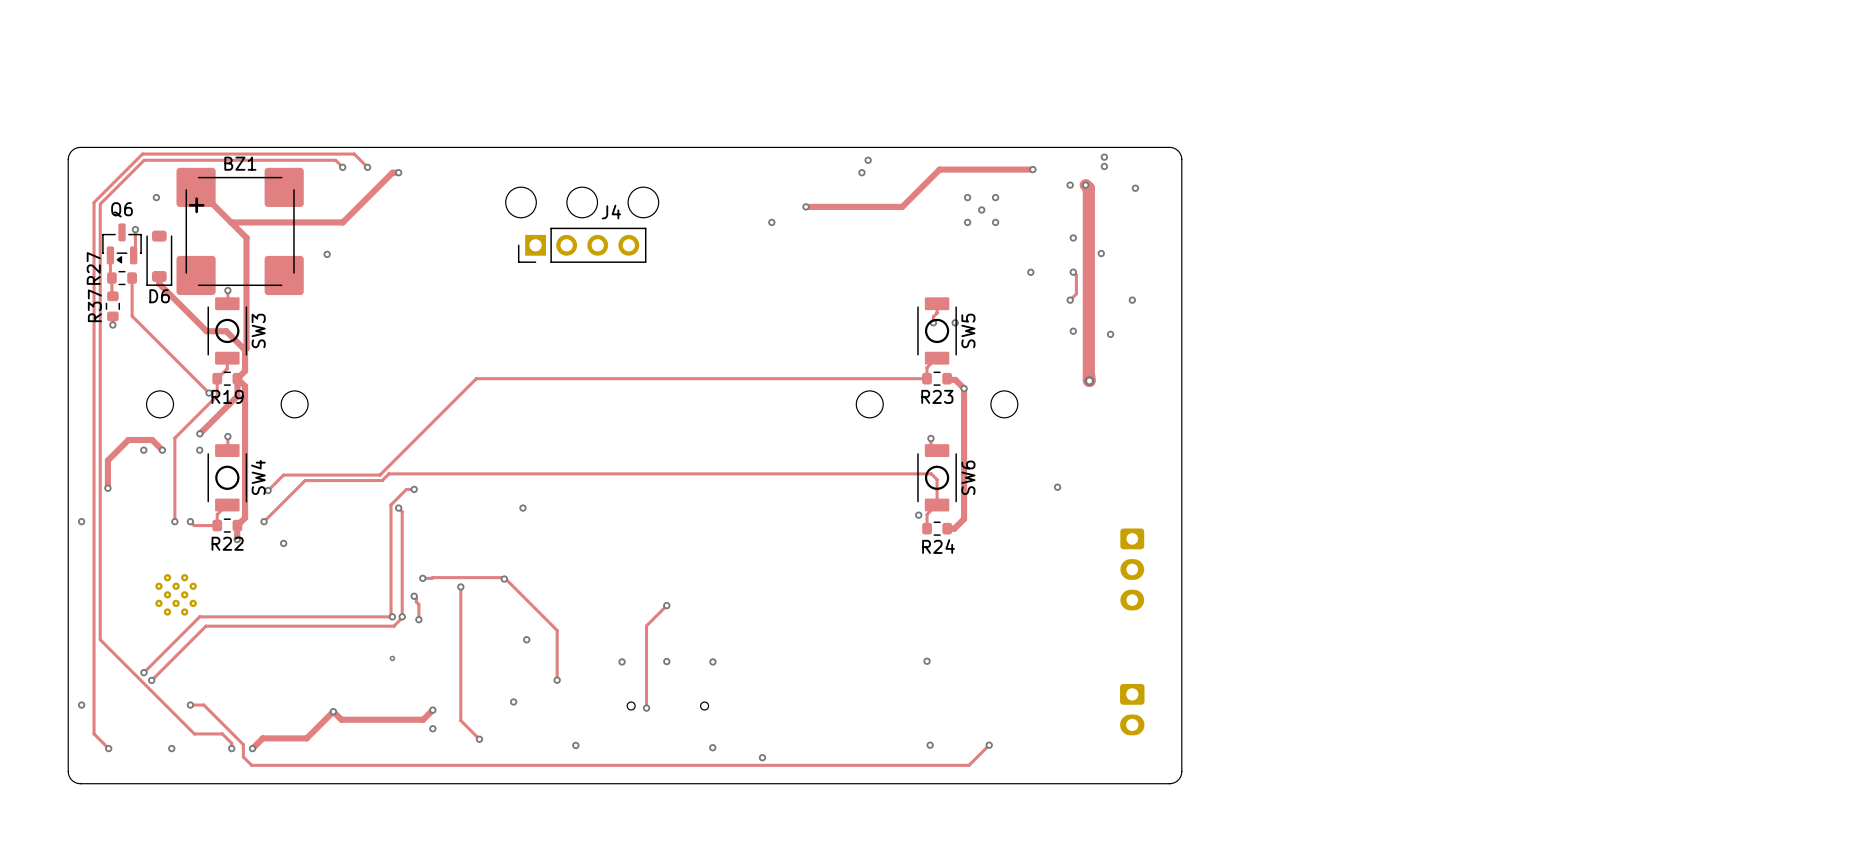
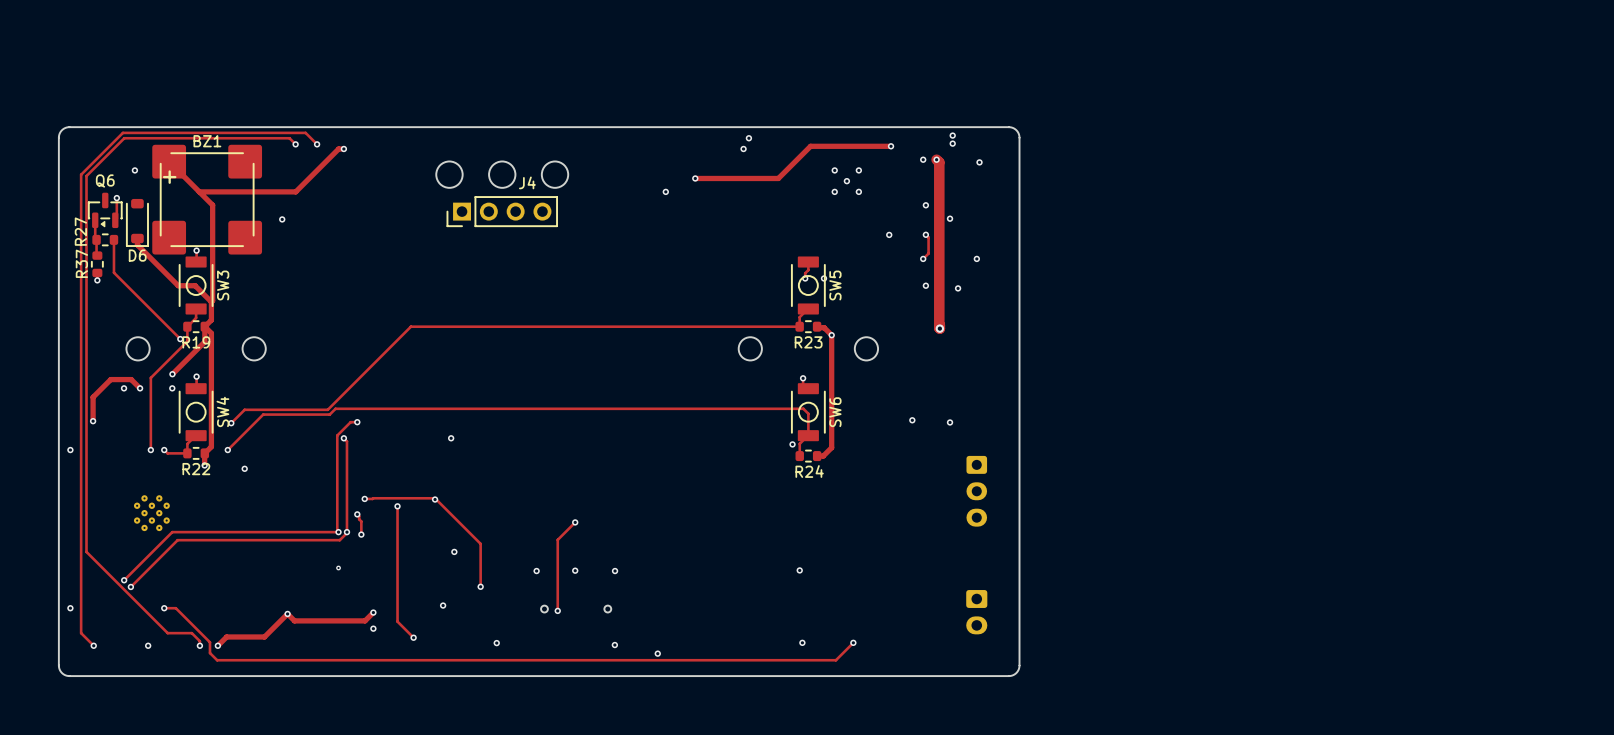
via: none -> (950, 422)

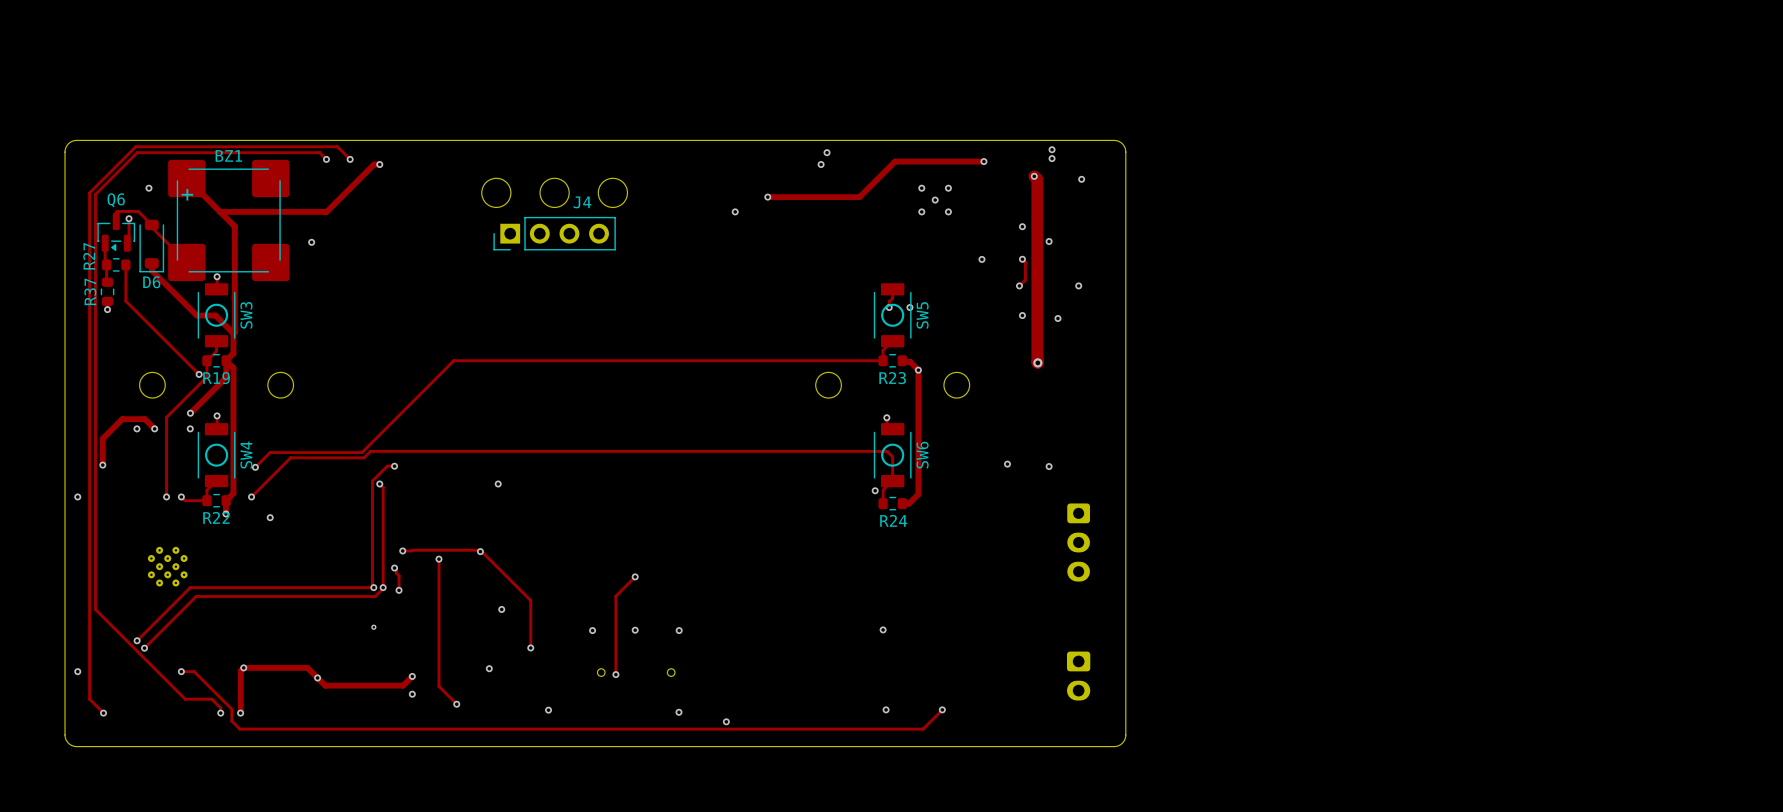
via: (923, 159) -> none
track: none -> (116, 221) (117, 211) (138, 211) (186, 262)
via: none -> (243, 667)
track: (287, 613) (264, 636) (226, 636) (218, 645) -> (317, 677) (307, 667) (243, 667) (240, 670) (240, 712)
via: (148, 645) -> none

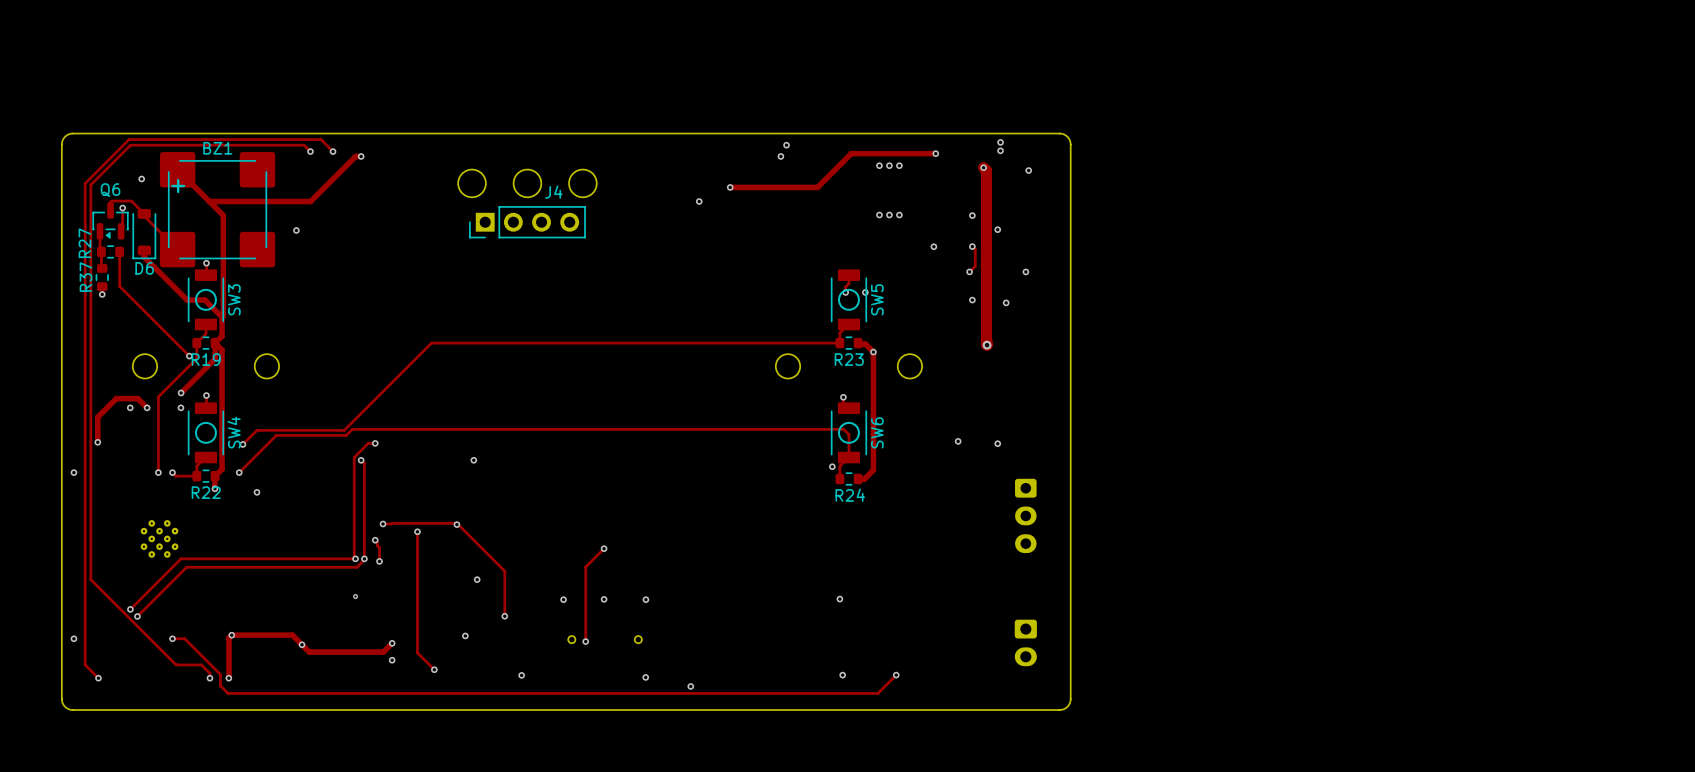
via: none -> (879, 165)
via: none -> (889, 165)
via: none -> (899, 165)
via: (921, 188) -> none
via: (948, 188) -> none
via: (935, 200) -> none
via: (921, 211) -> none
via: (948, 211) -> none
via: none -> (879, 215)
via: none -> (889, 215)
via: none -> (899, 215)

